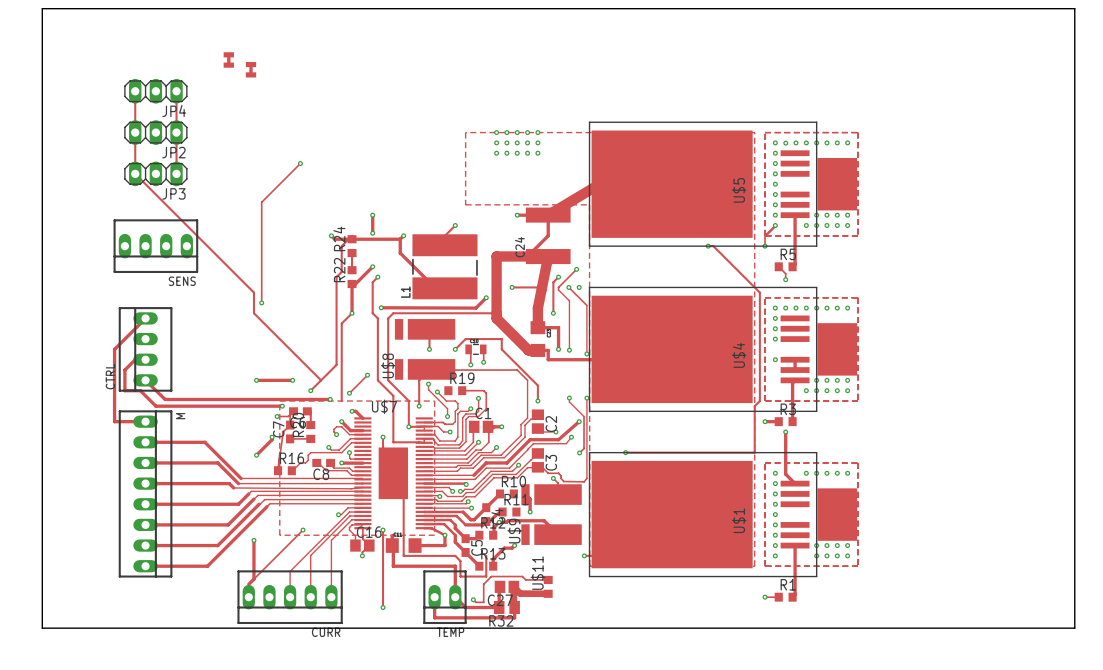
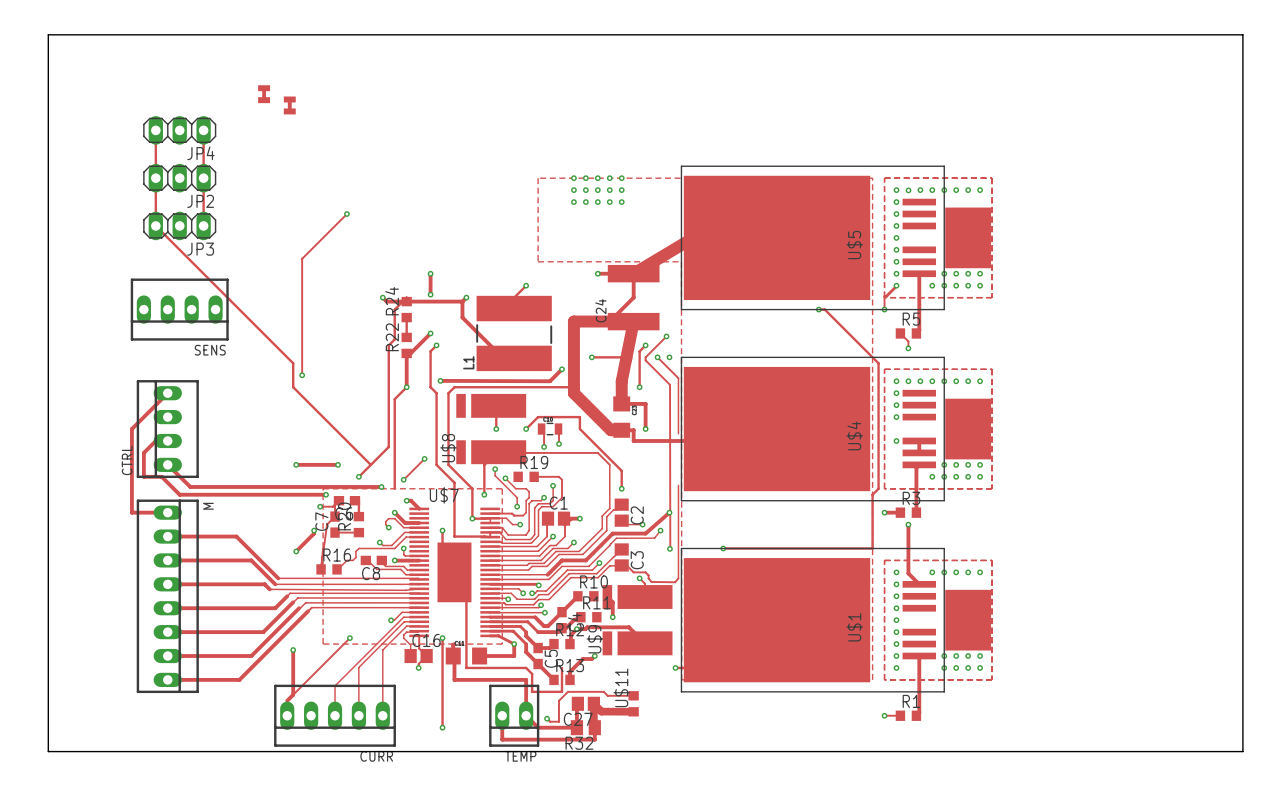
track: (558, 290) (569, 300) (569, 350) -> (645, 360) (670, 384) (669, 548)
via: (569, 350) -> none
via: (586, 353) -> none
track: (569, 398) (569, 401) (584, 416) (584, 448) (579, 452) -> none
via: (569, 398) -> none
via: (586, 398) -> none

